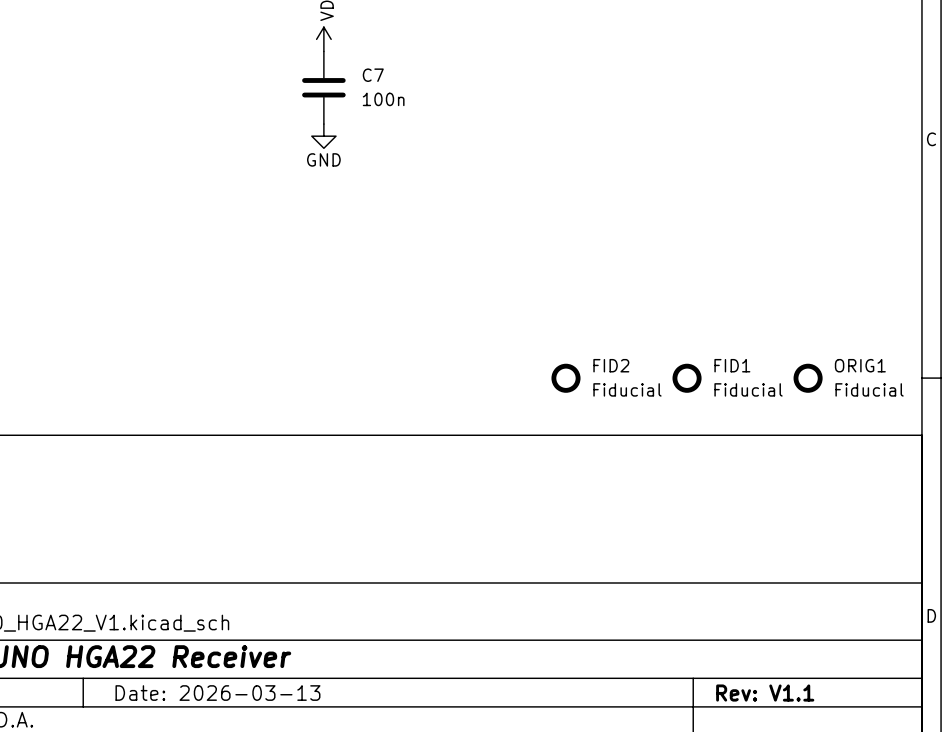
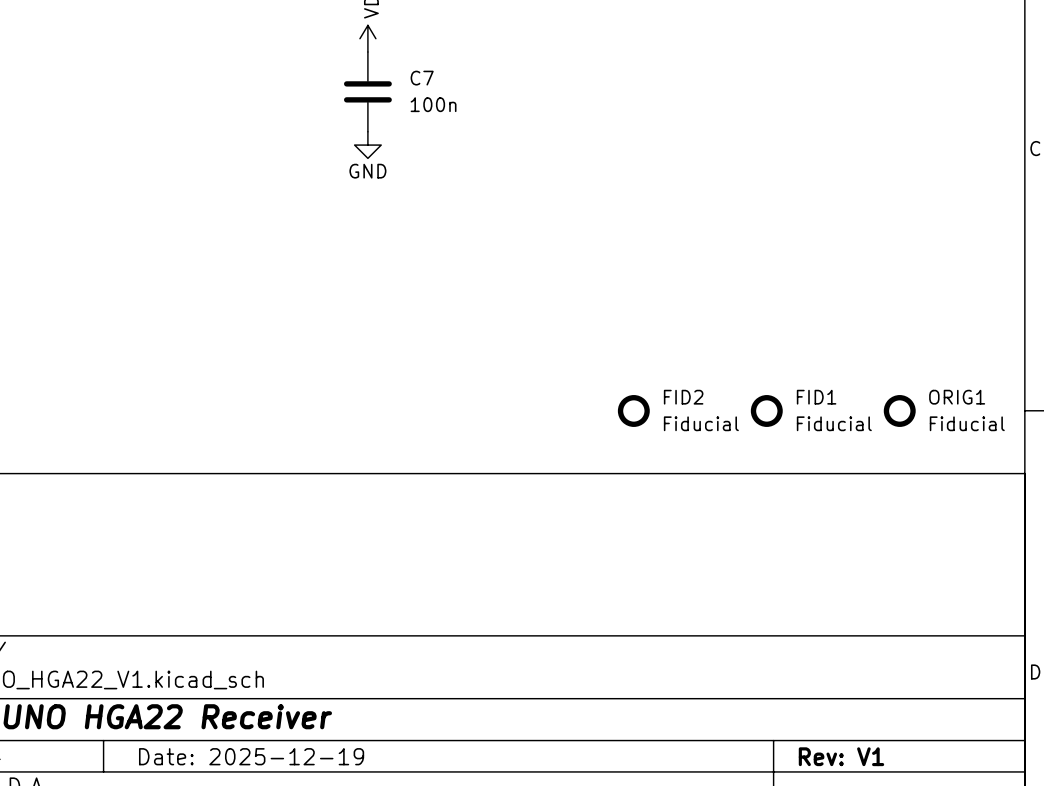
title block: Date: 2026-03-13 (217, 693) -> Date: 2025-12-19 (251, 756)
title block: Rev: V1.1 (765, 693) -> Rev: V1 (841, 756)

